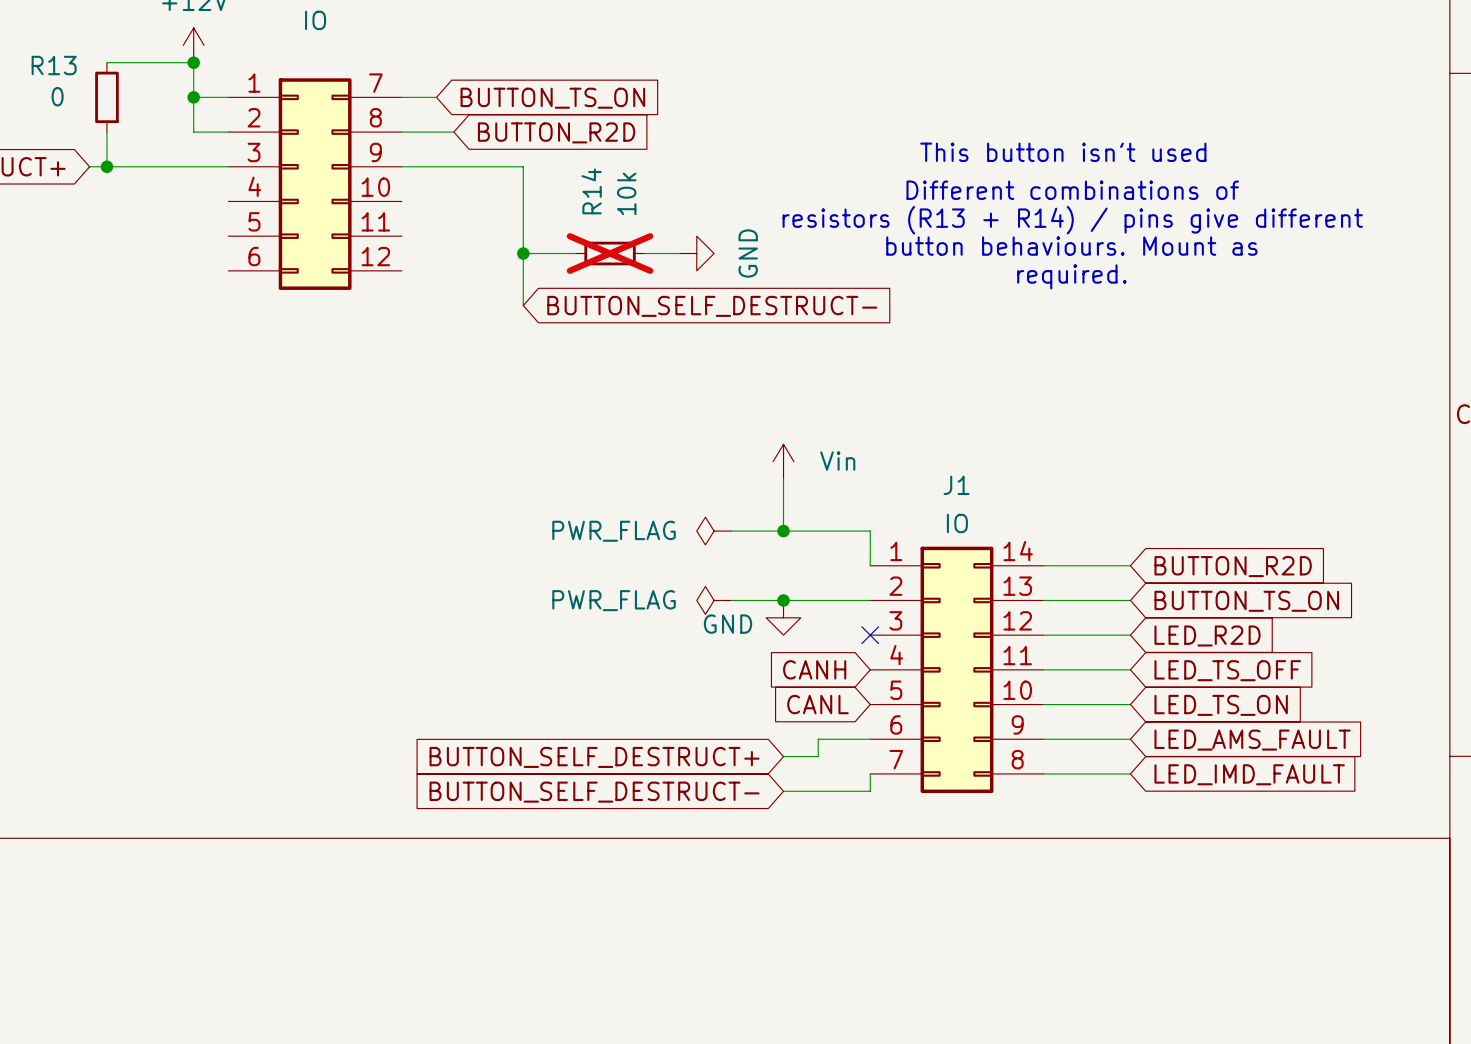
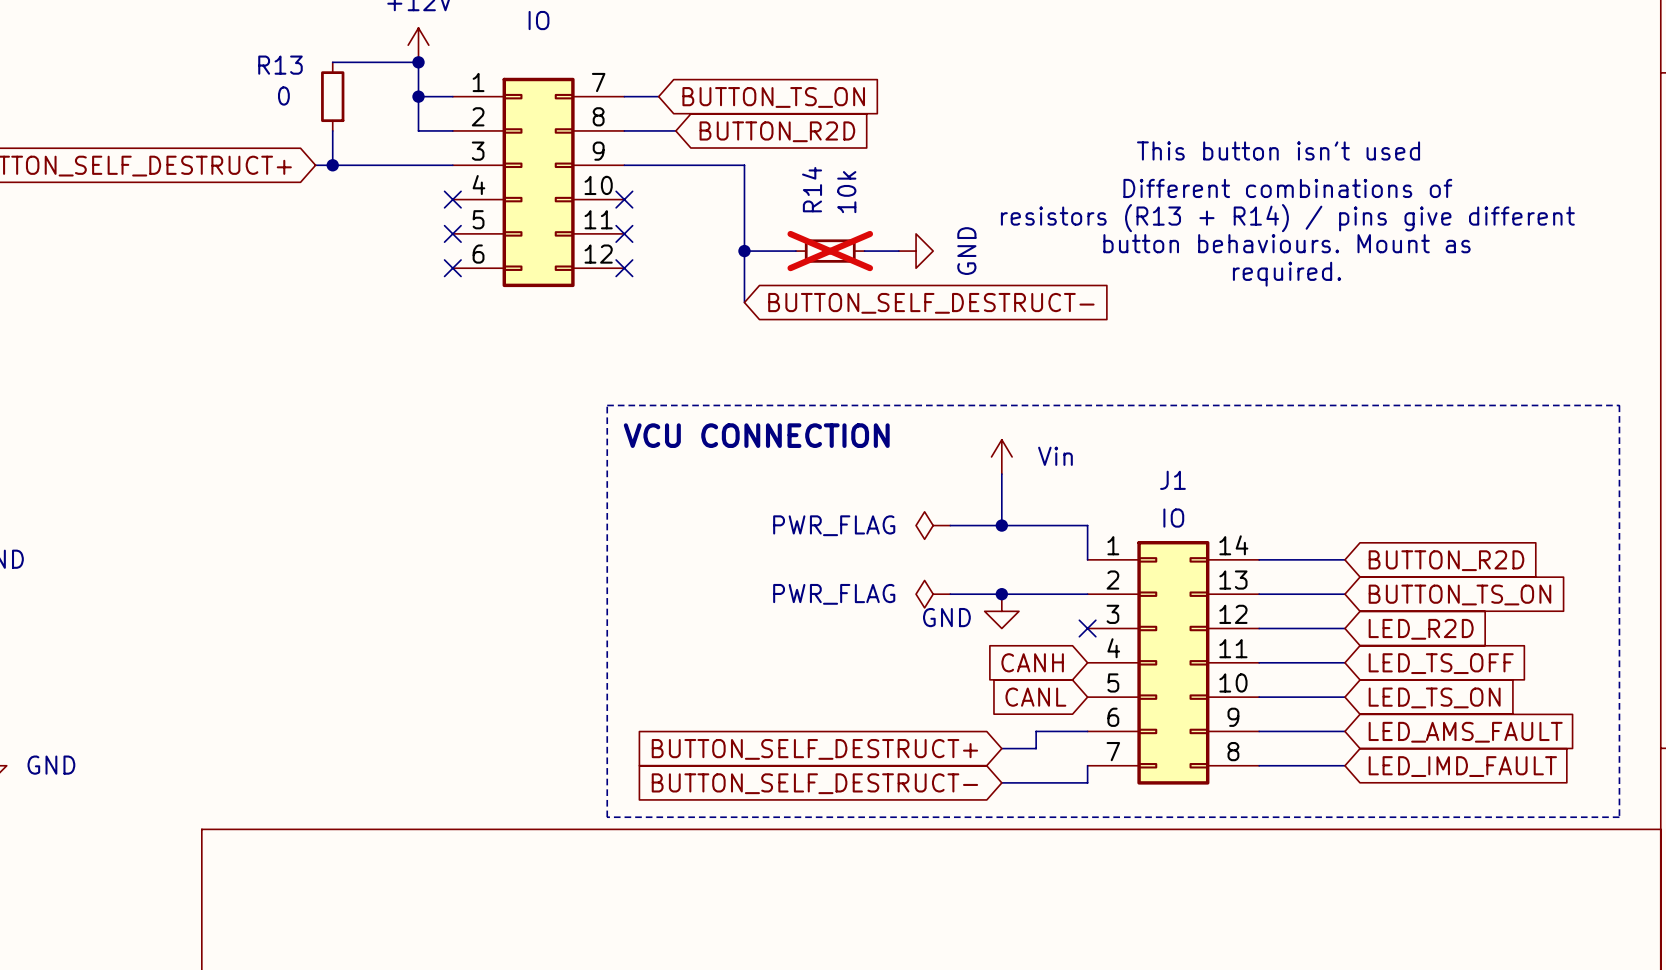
no-connect mark: none -> (452, 199)
no-connect mark: none -> (624, 199)
no-connect mark: none -> (452, 233)
no-connect mark: none -> (624, 233)
no-connect mark: none -> (452, 268)
no-connect mark: none -> (624, 268)
line: none -> (607, 405) (1619, 405) (1619, 817) (607, 817) (607, 405)
text: none -> VCU CONNECTION (756, 435)

